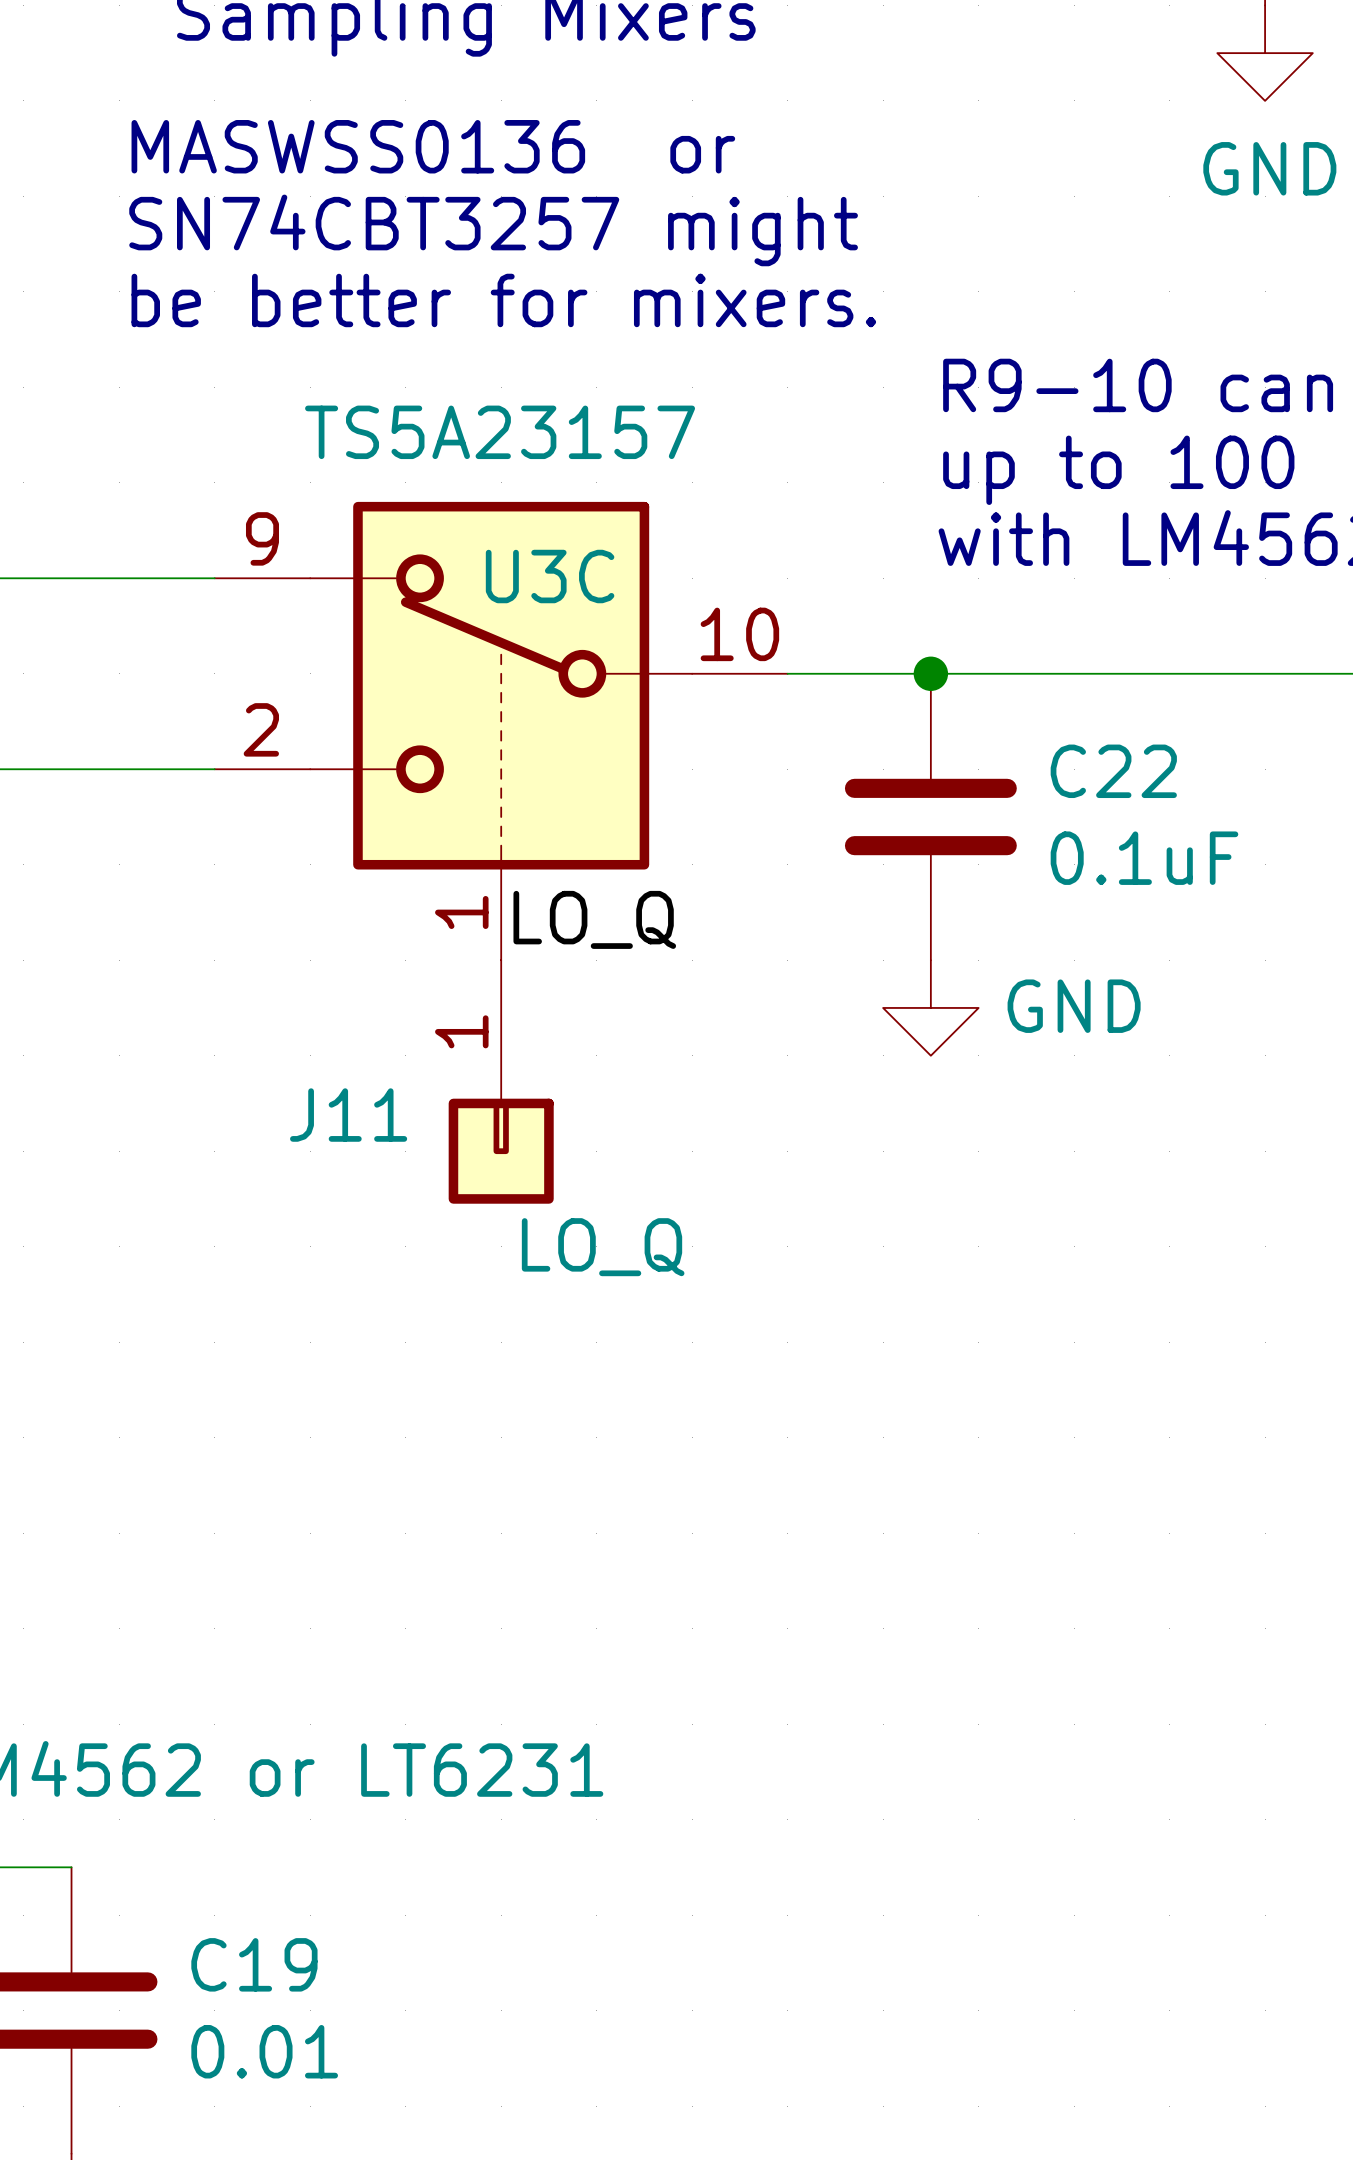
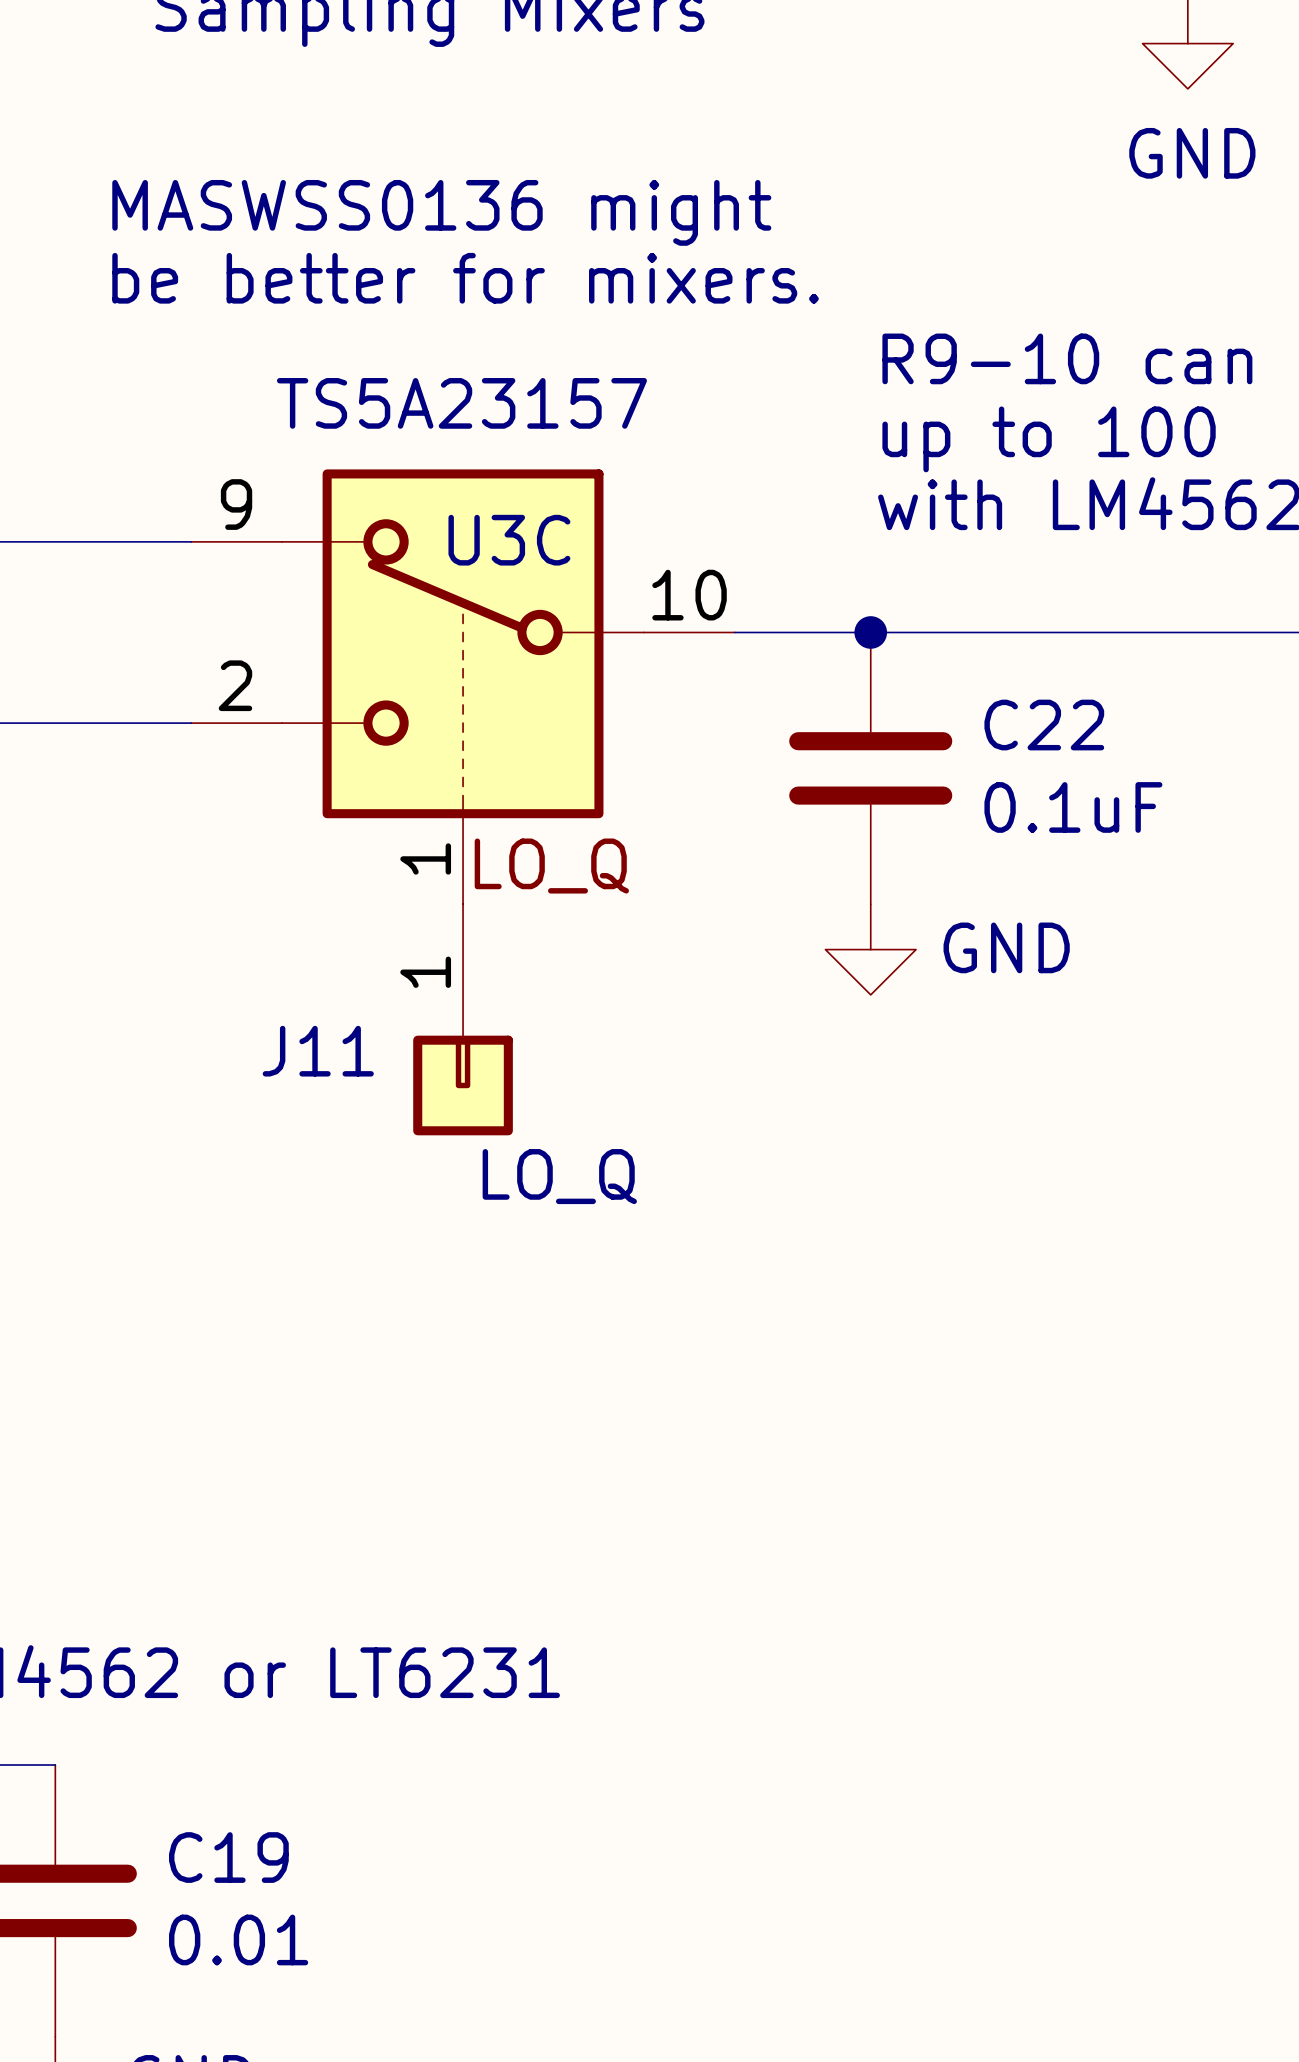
text: MASWSS0136 or (433, 146) -> none
text: SN74CBT3257 might (493, 230) -> MASWSS0136 might (441, 212)

